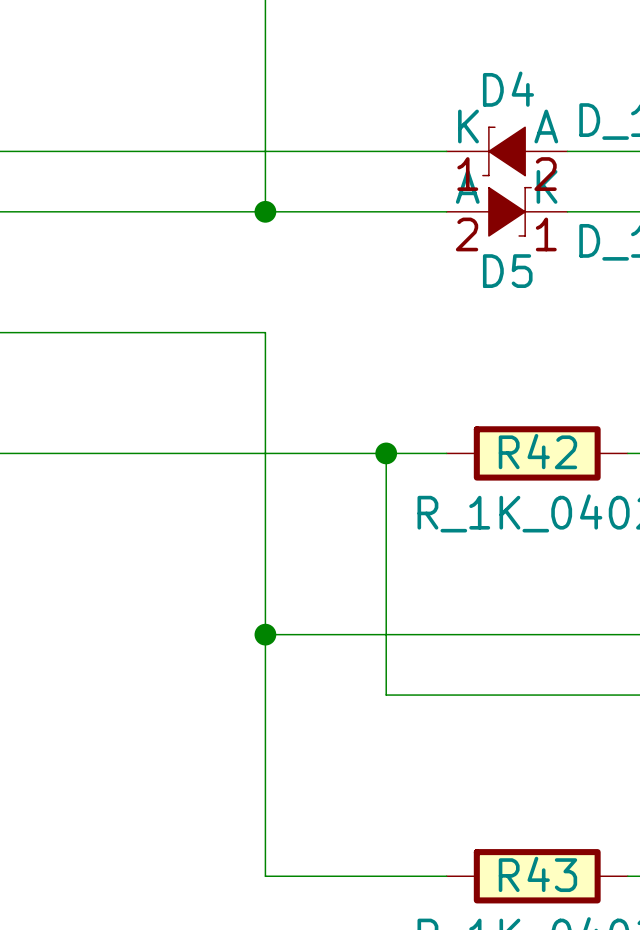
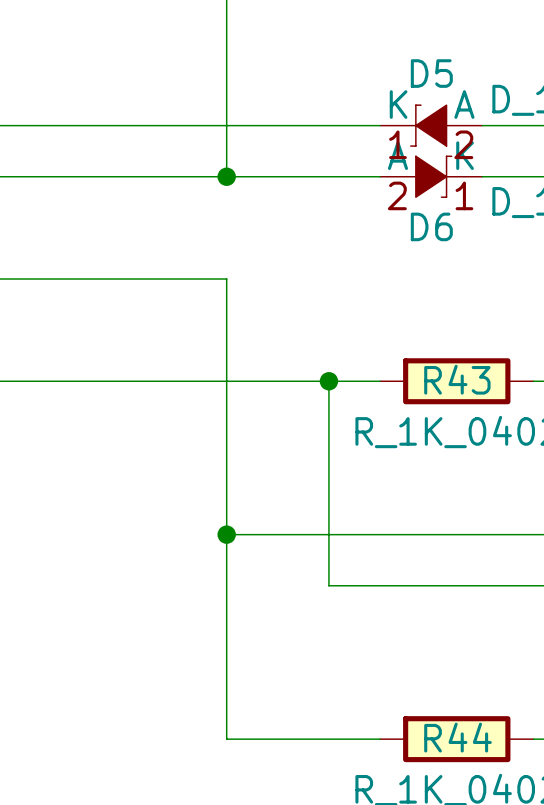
D4 name: D4 (508, 89) -> D5 (431, 73)
D5 name: D5 (507, 271) -> D6 (431, 226)
R42 name: R42 (537, 451) -> R43 (457, 379)
R43 name: R43 (537, 874) -> R44 (457, 737)

